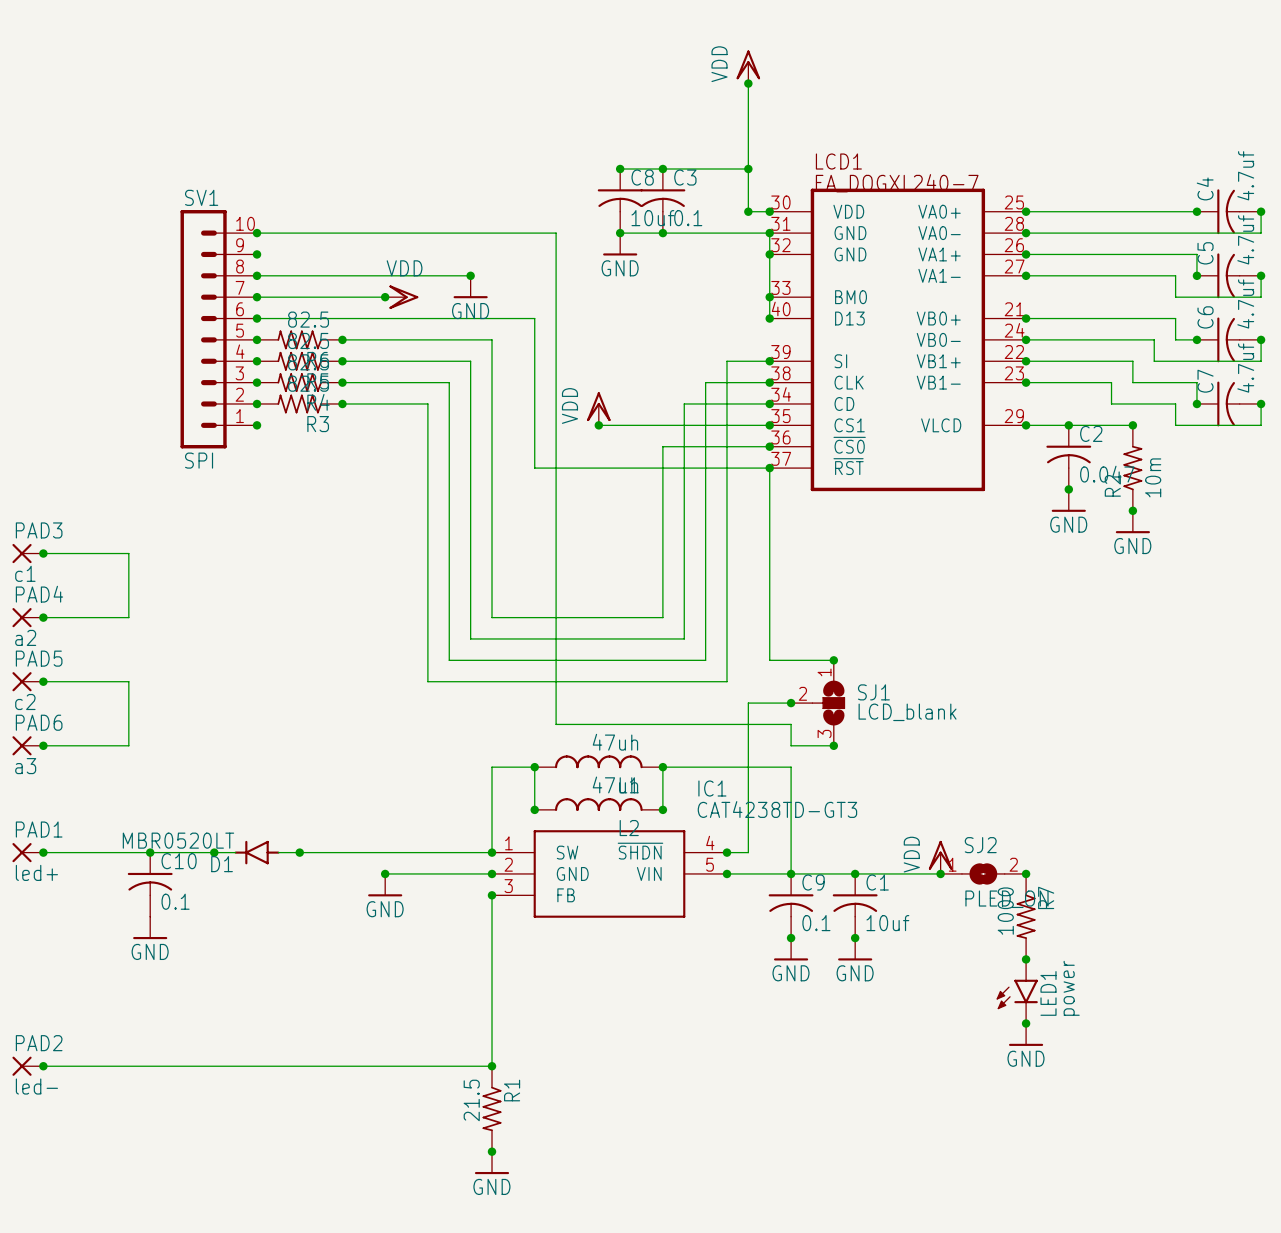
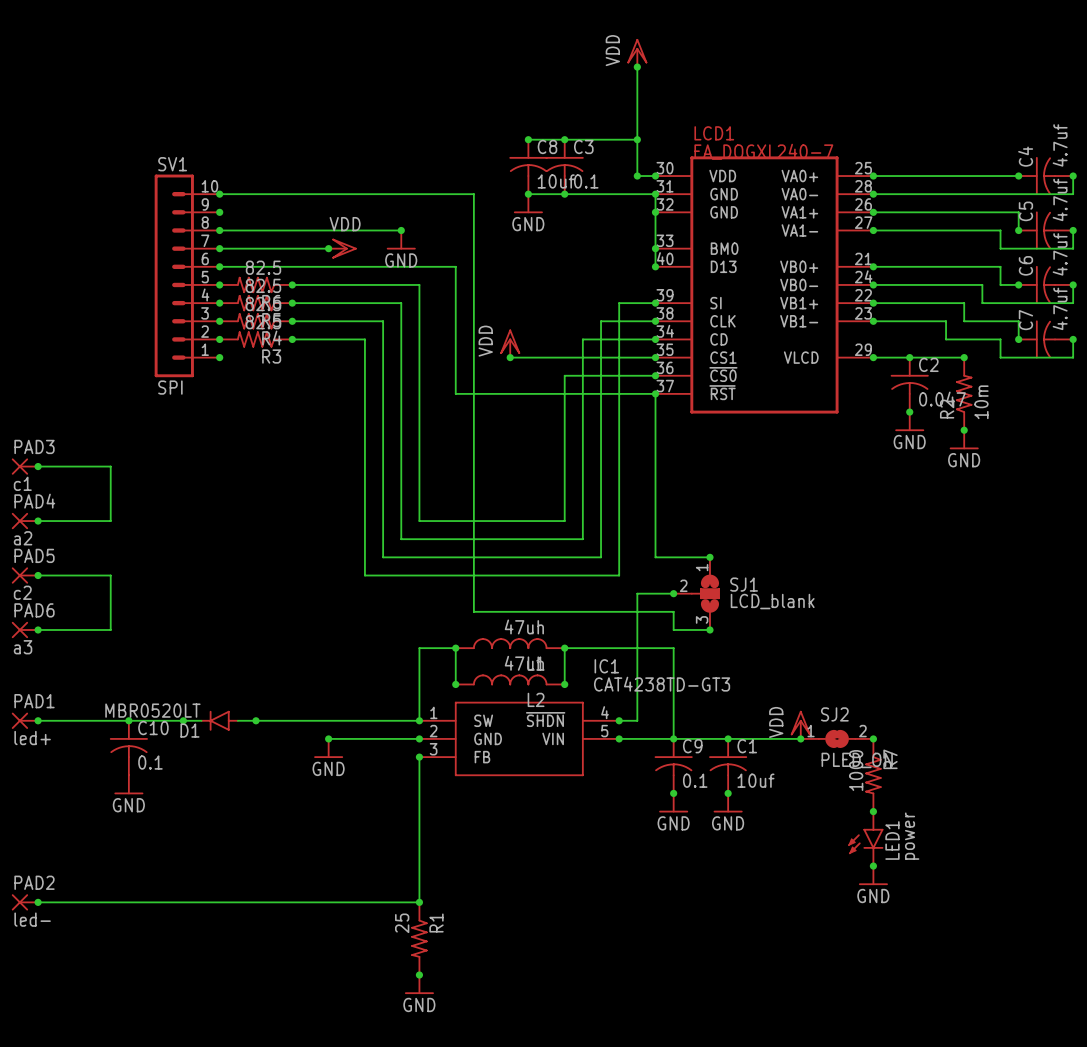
R1 value: 21.5 (471, 1100) -> 25 (402, 923)

